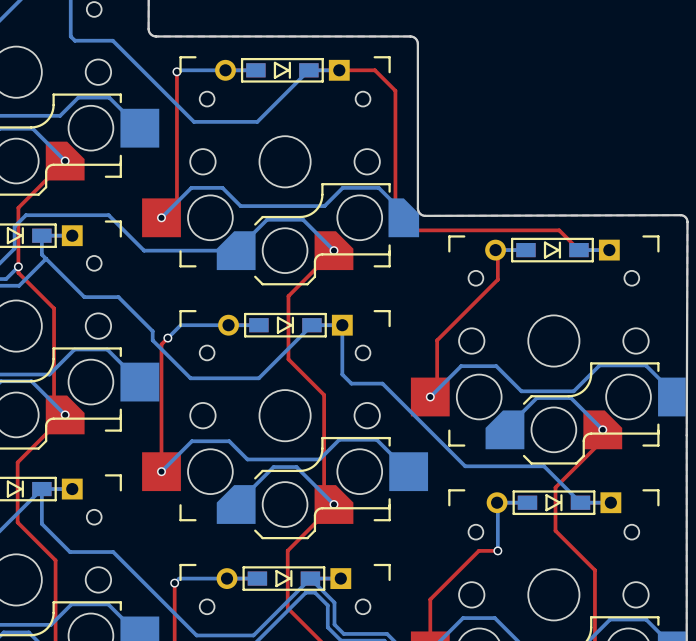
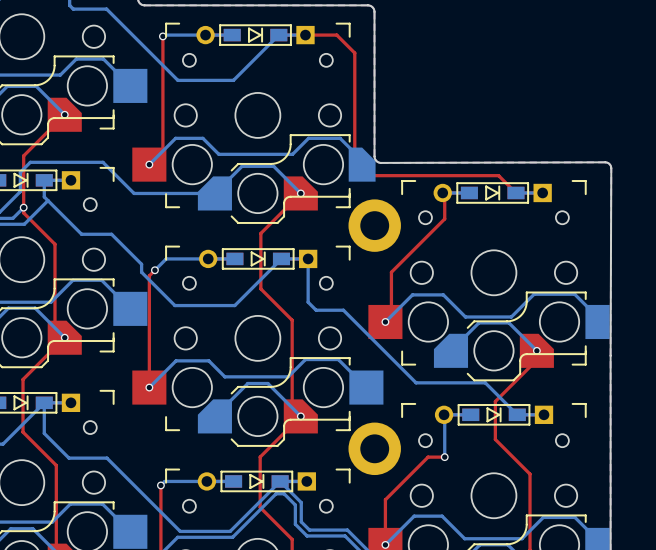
part: none -> (374, 225)
part: none -> (374, 448)

